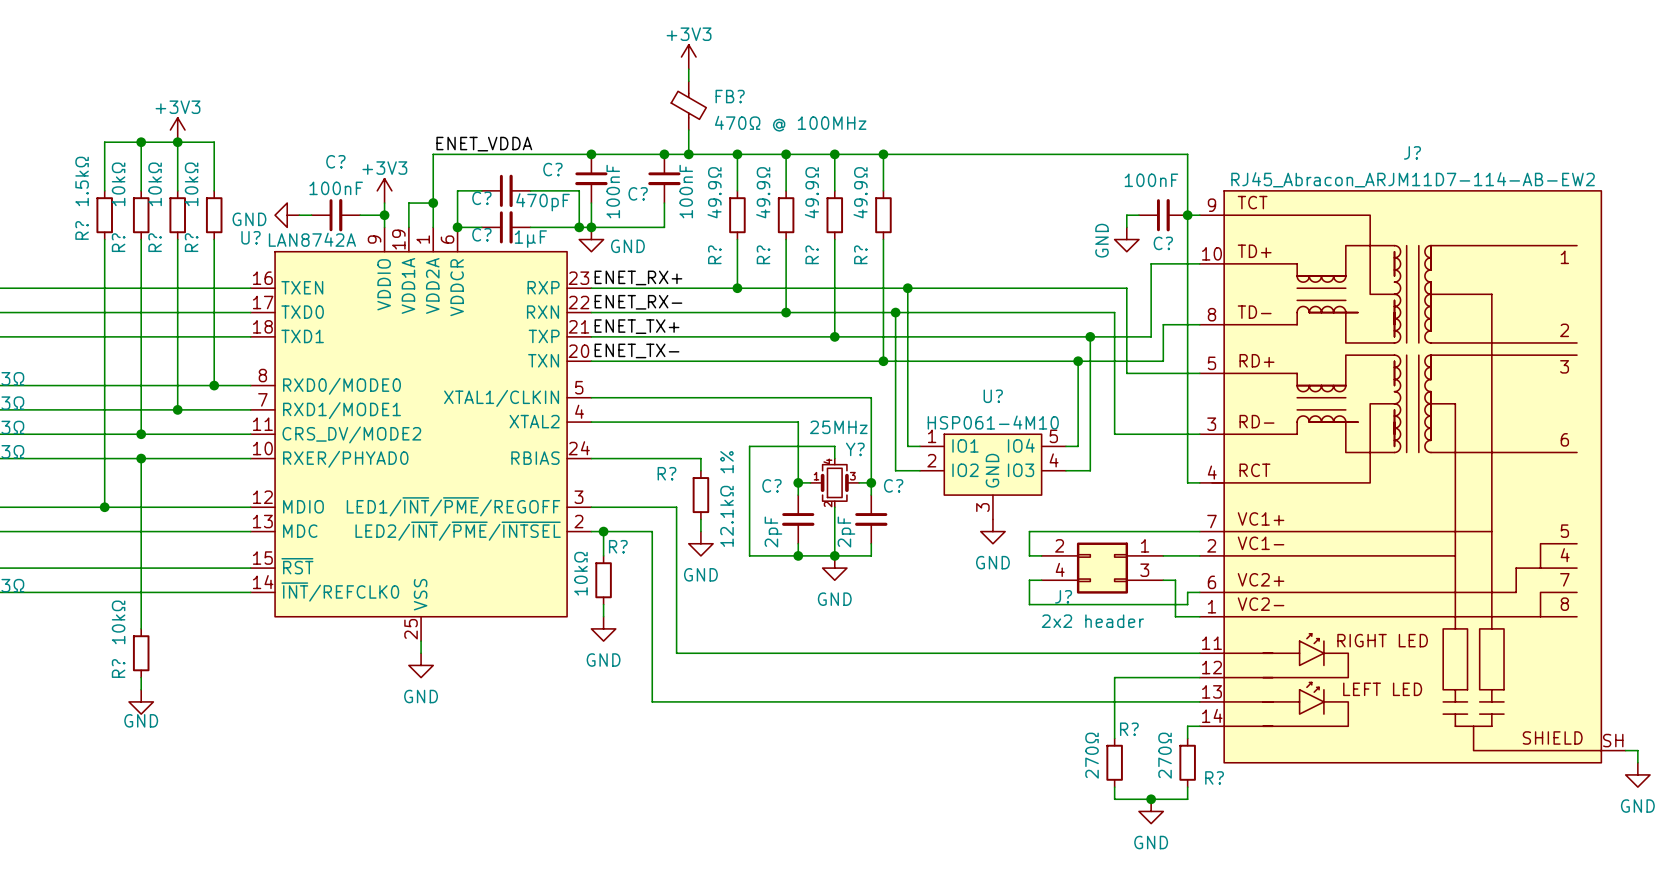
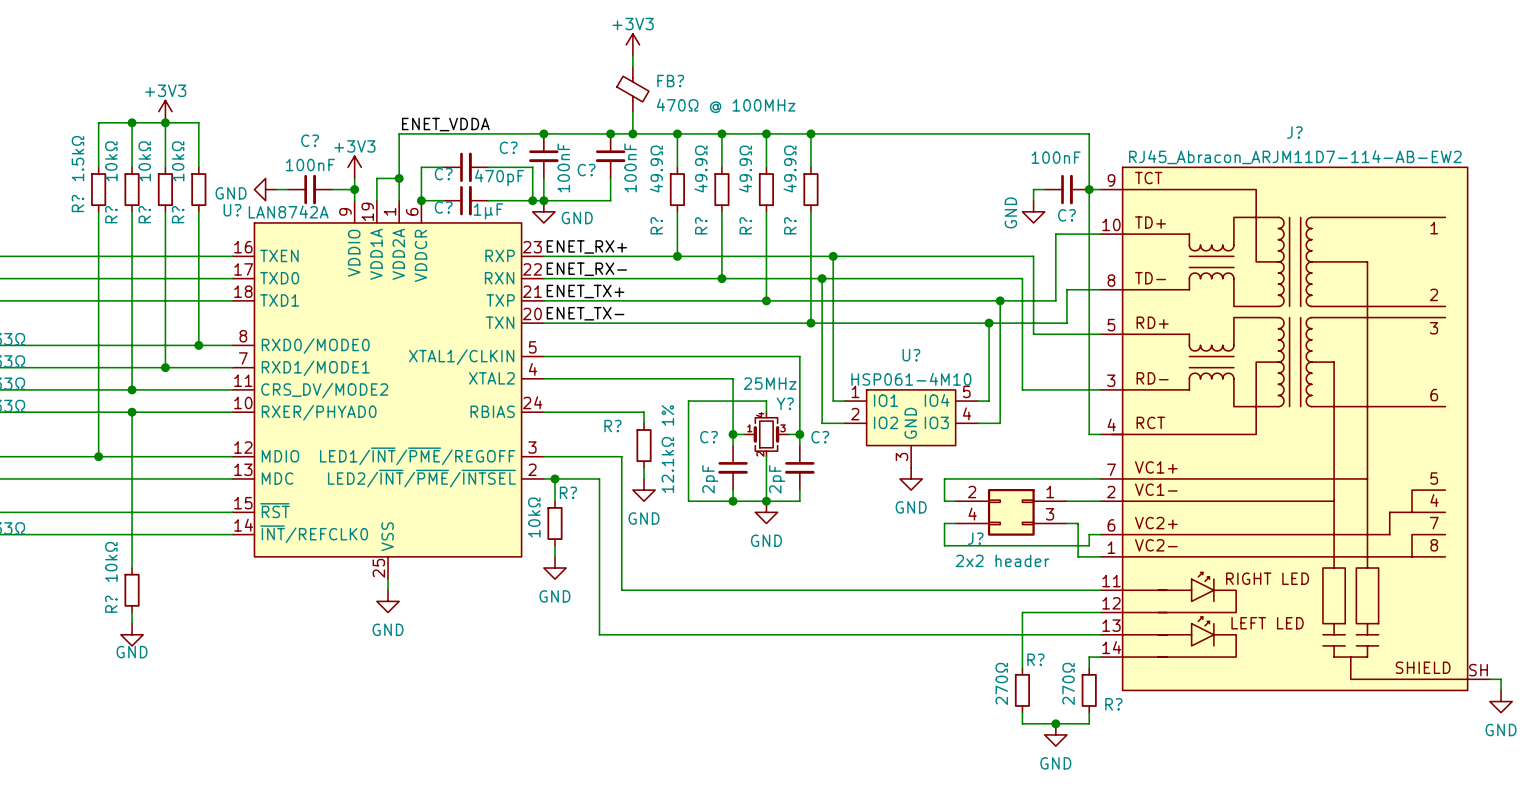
J? symbol: [1199, 190, 1626, 764] -> [1100, 166, 1490, 692]

